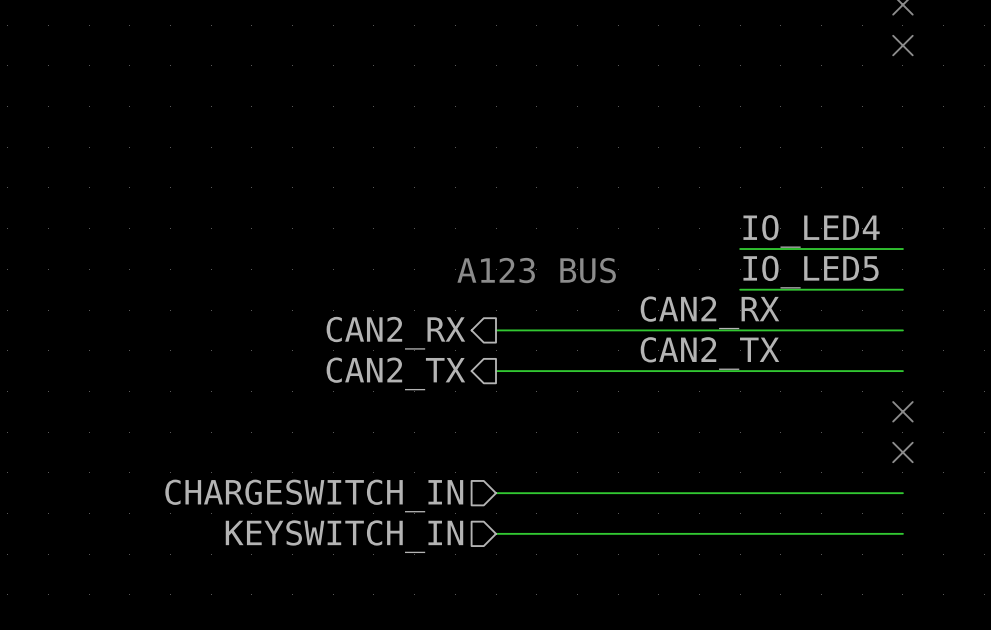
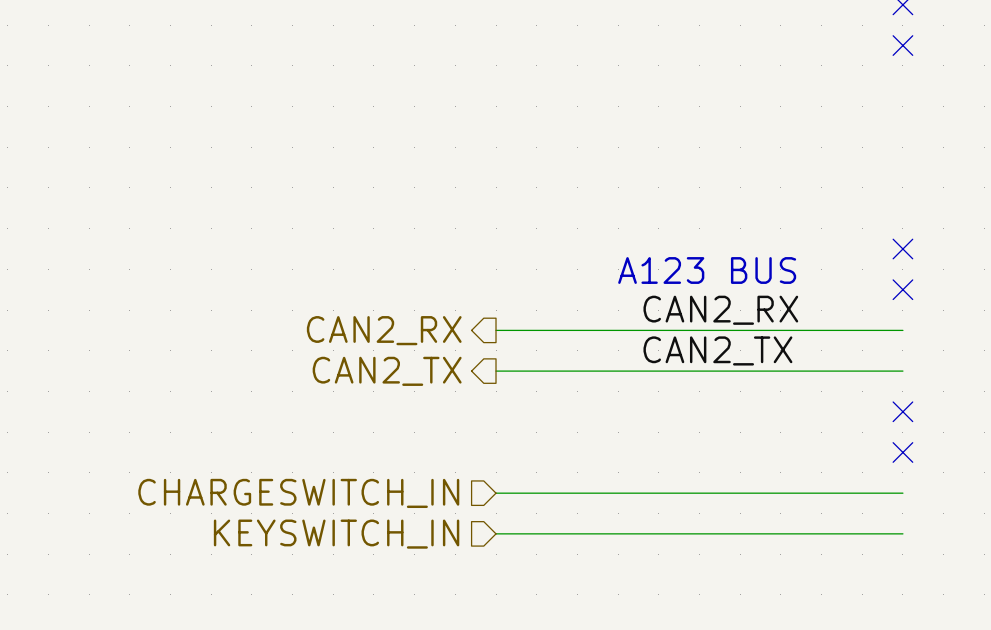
label: IO_LED4 (811, 231) -> none
wire: (740, 249) (902, 249) -> none
no-connect mark: none -> (902, 249)
text position: A123 BUS (536, 270) -> A123 BUS (707, 270)
label: IO_LED5 (811, 272) -> none
wire: (740, 289) (902, 289) -> none
no-connect mark: none -> (902, 289)

